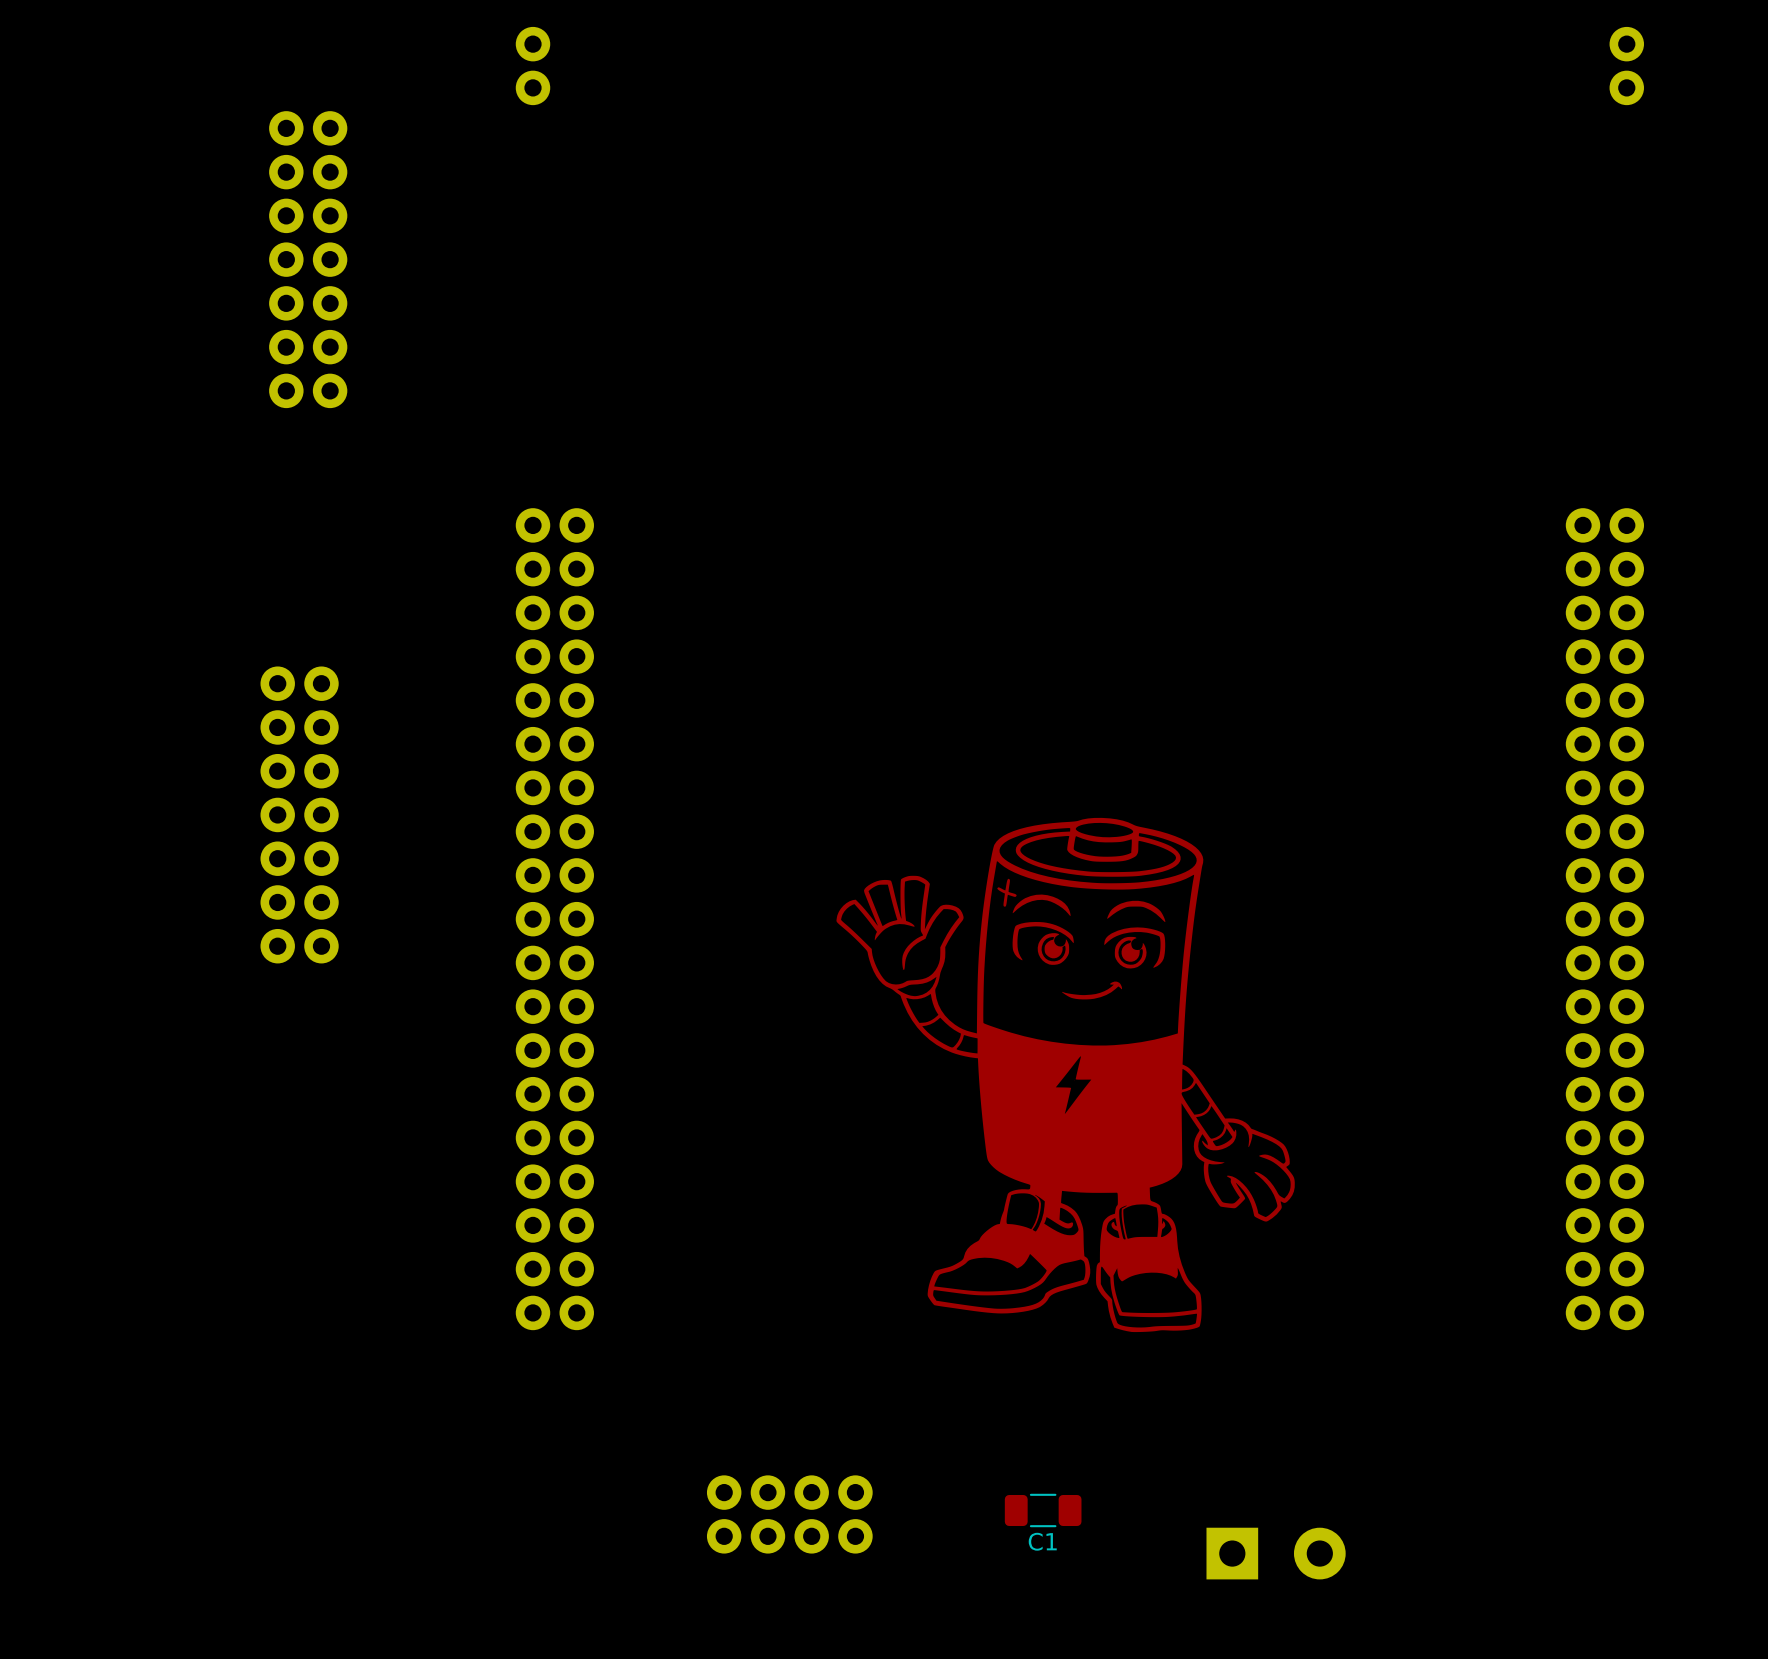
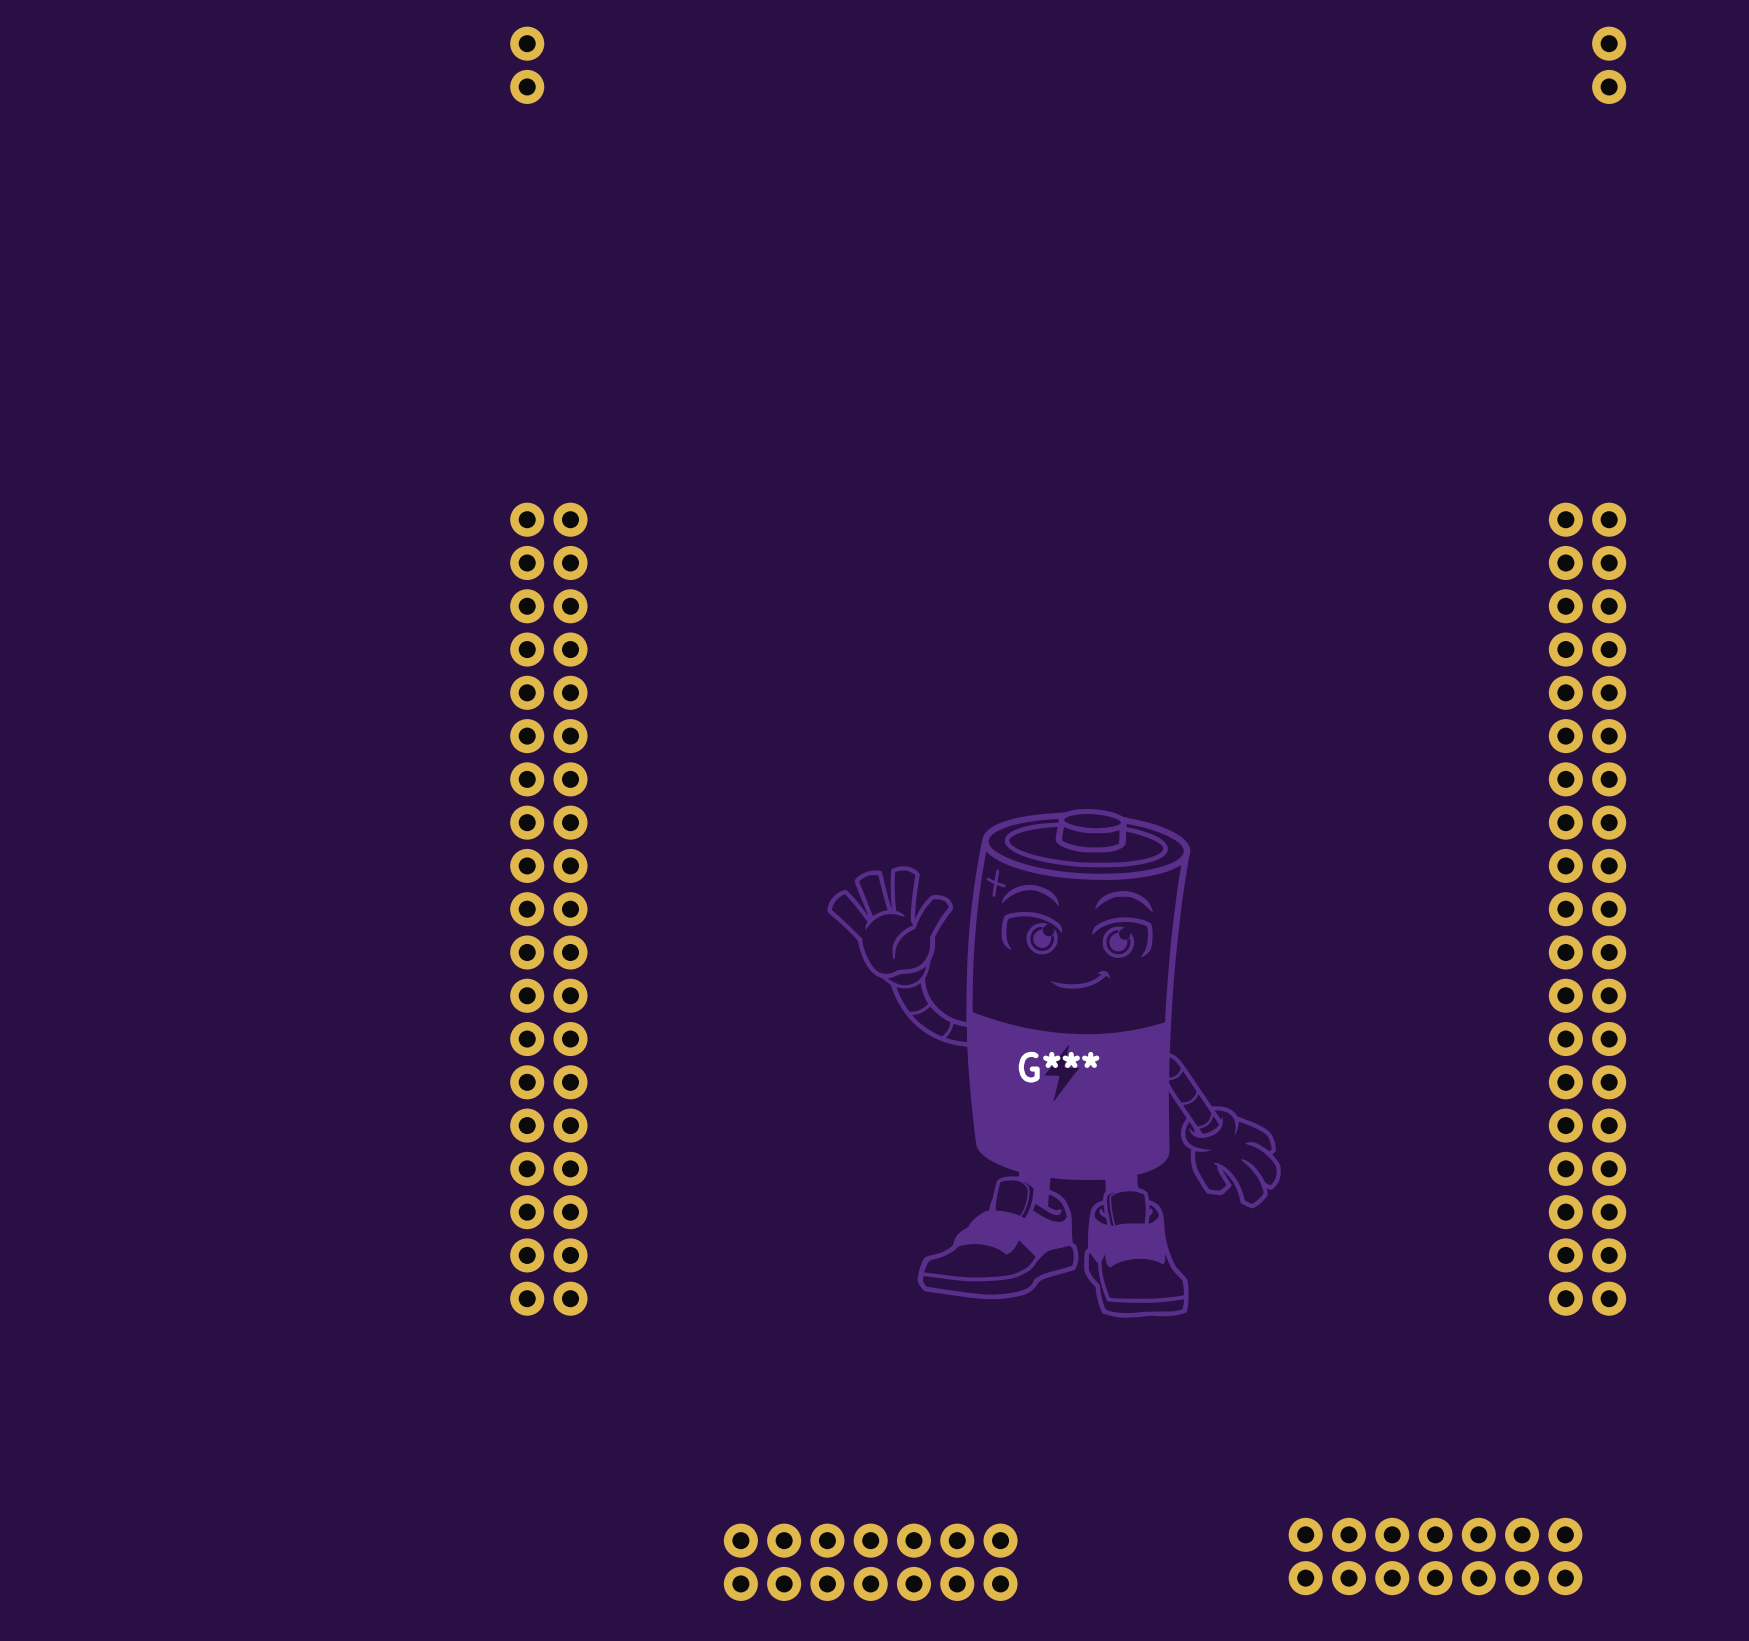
part: (308, 259) -> none
part: (299, 814) -> none
drawing: [836, 817, 1295, 1333] -> none
G***: none -> (1054, 1063)
C1: (1043, 1510) -> none
part: (789, 1514) -> none
part: (1276, 1553) -> none
part: none -> (1435, 1556)
part: none -> (870, 1562)

